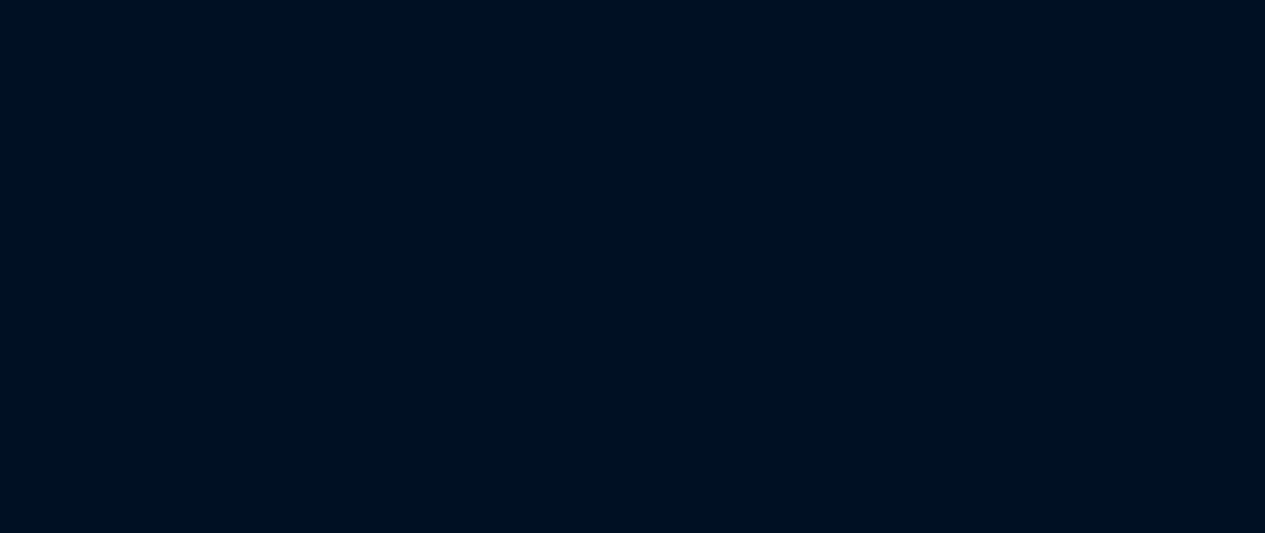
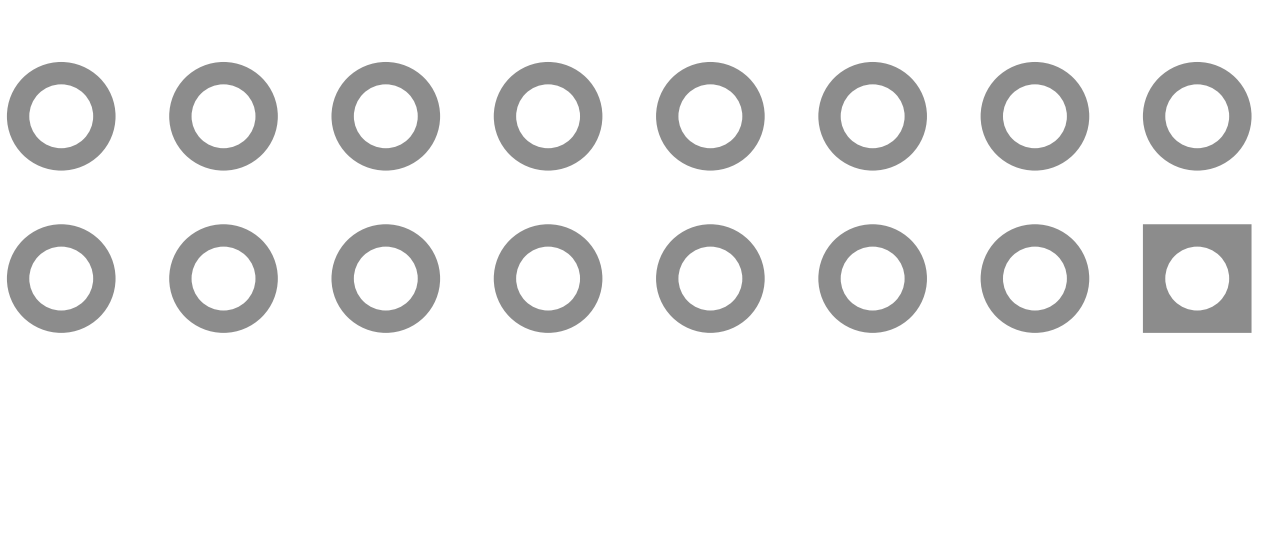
part: none -> (629, 197)

